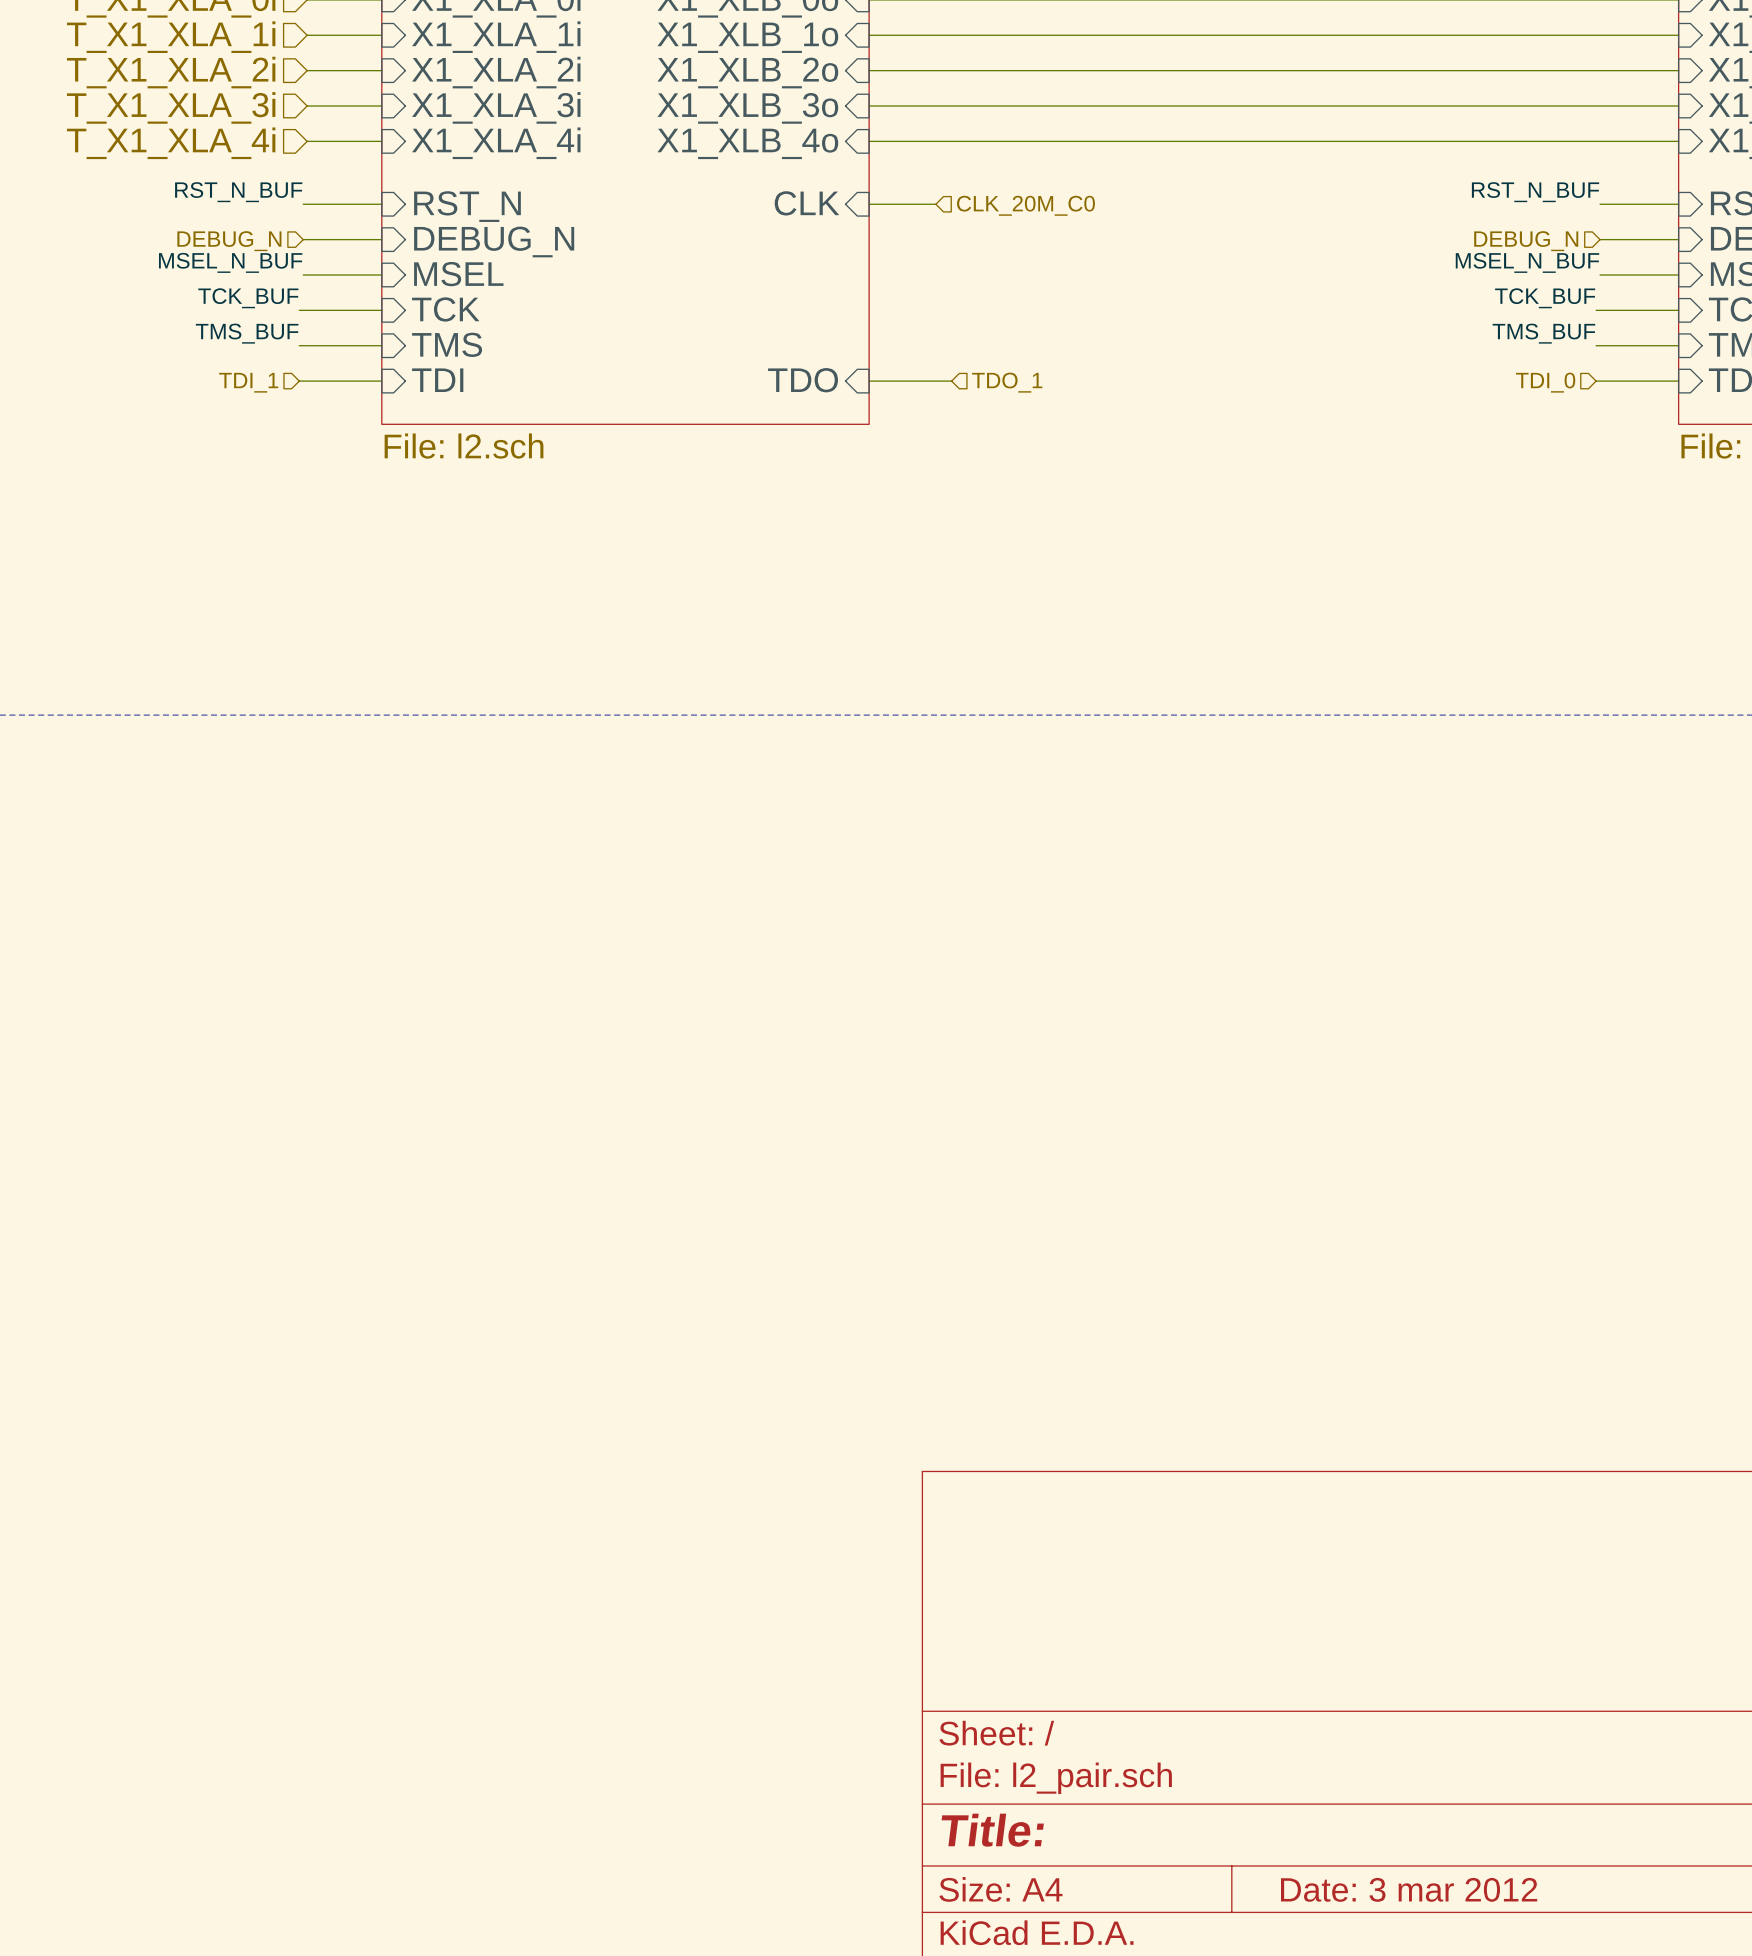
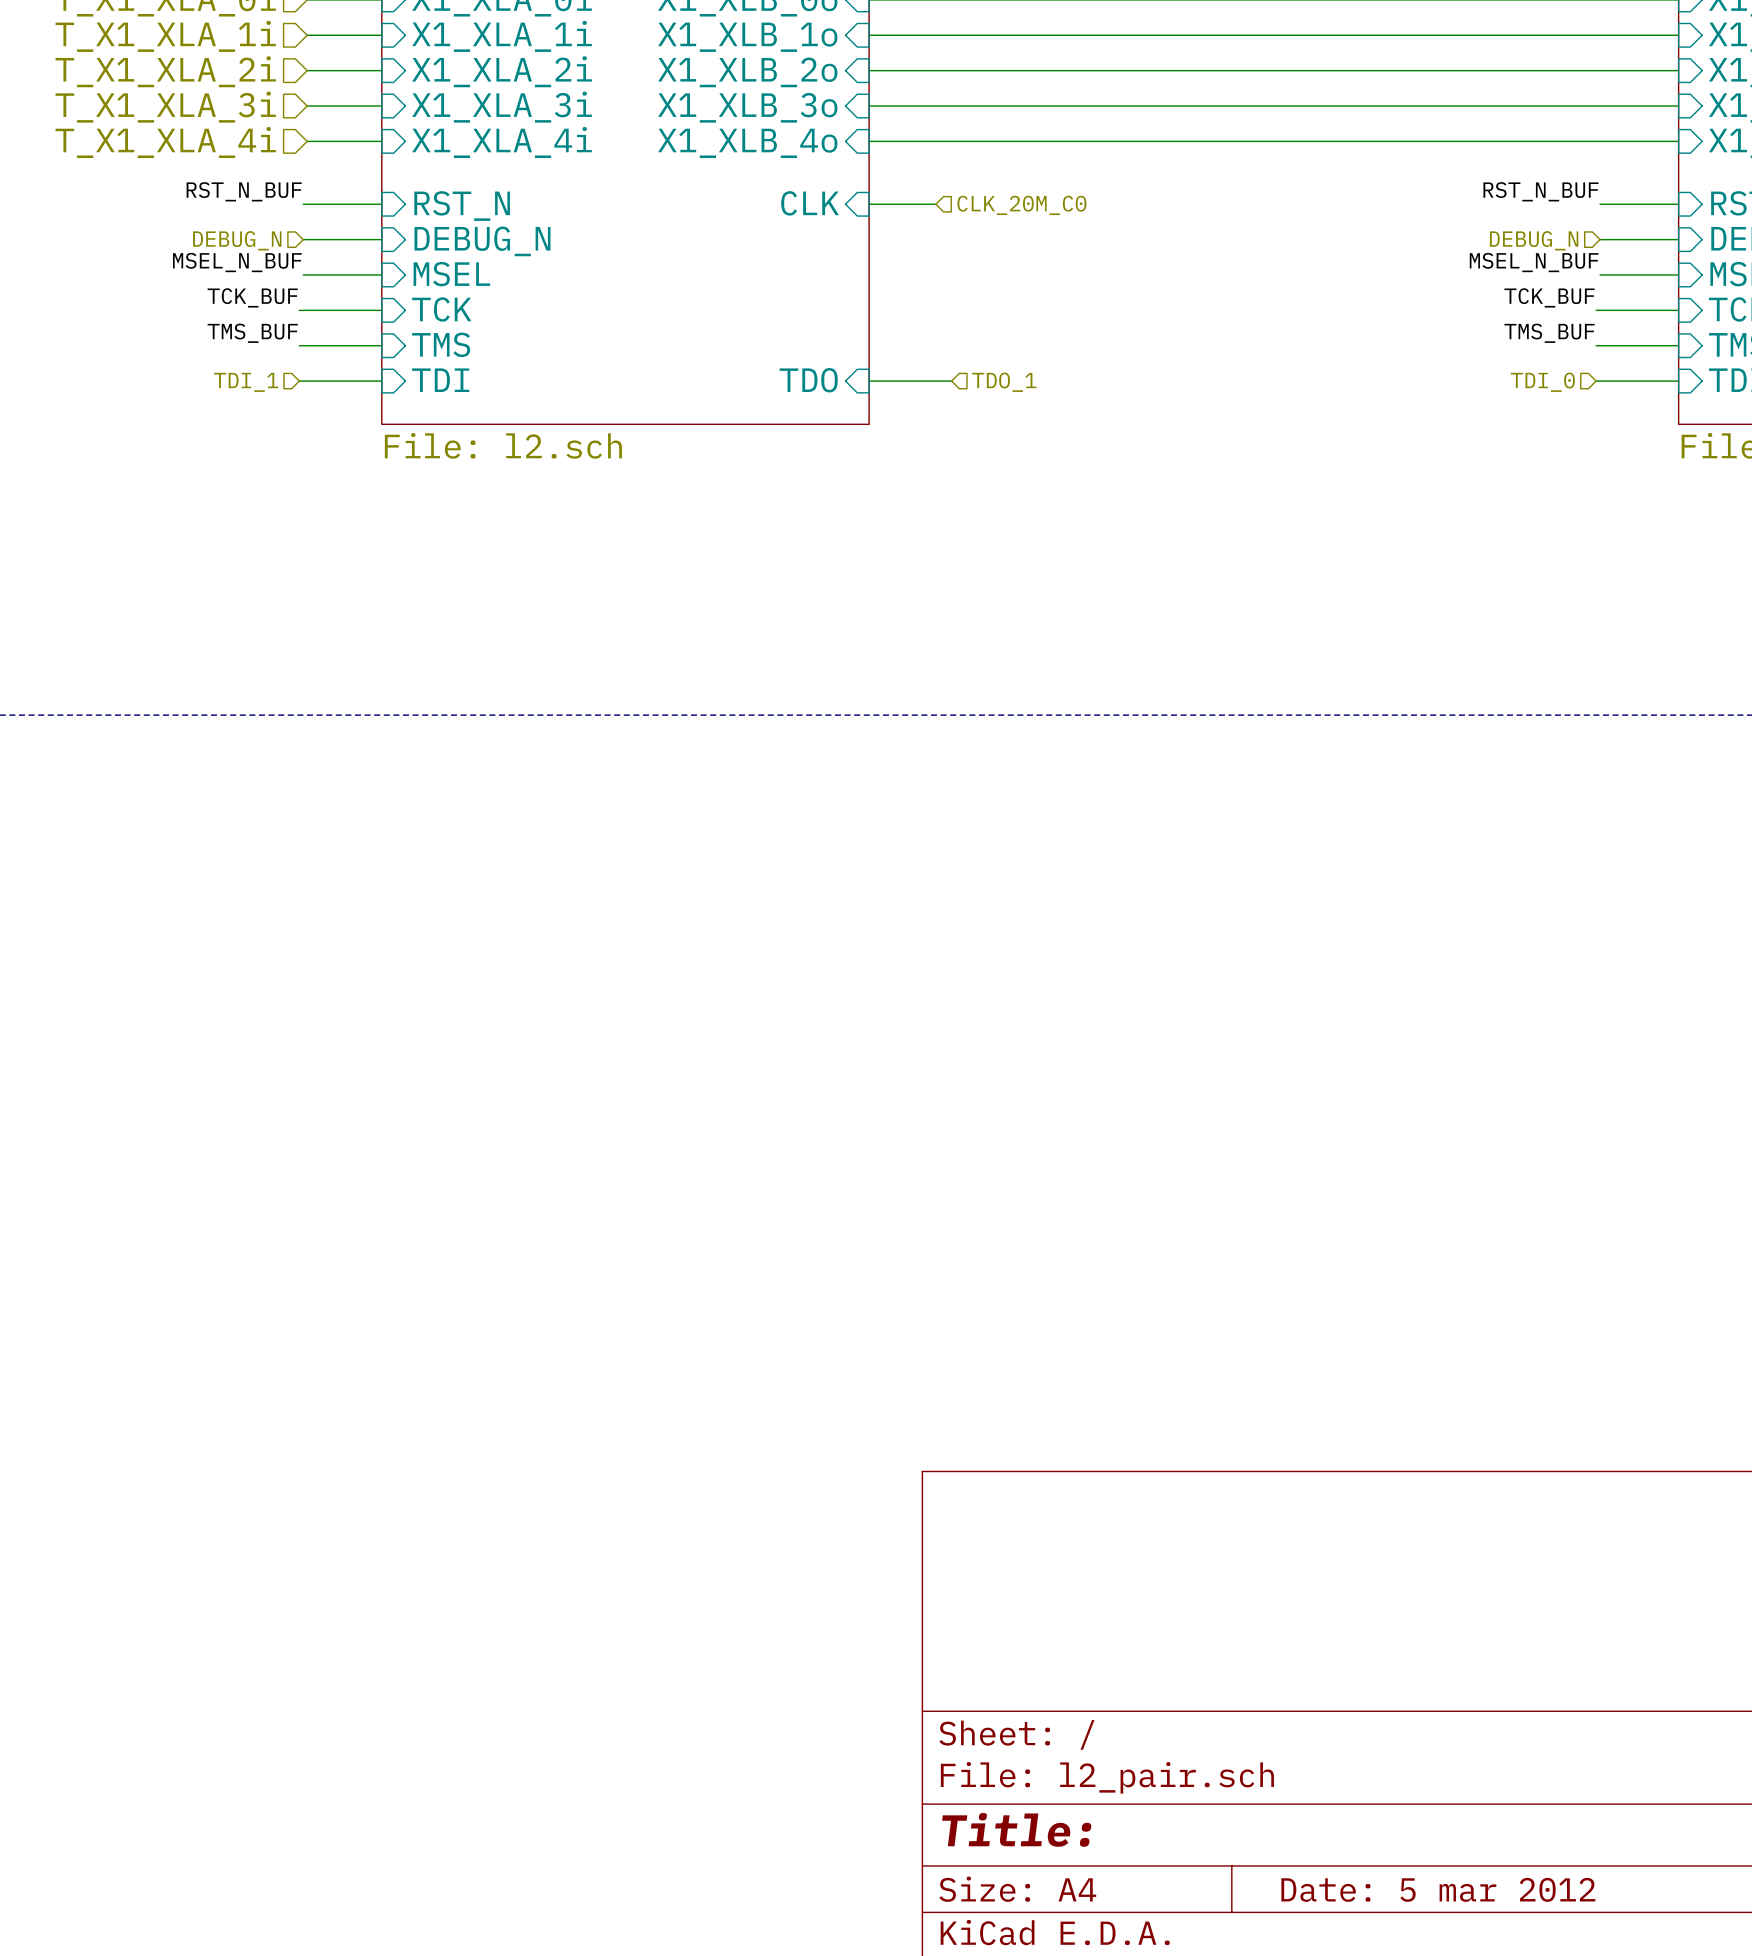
title block: Date: 3 mar 2012 (1409, 1889) -> Date: 5 mar 2012 (1438, 1889)

